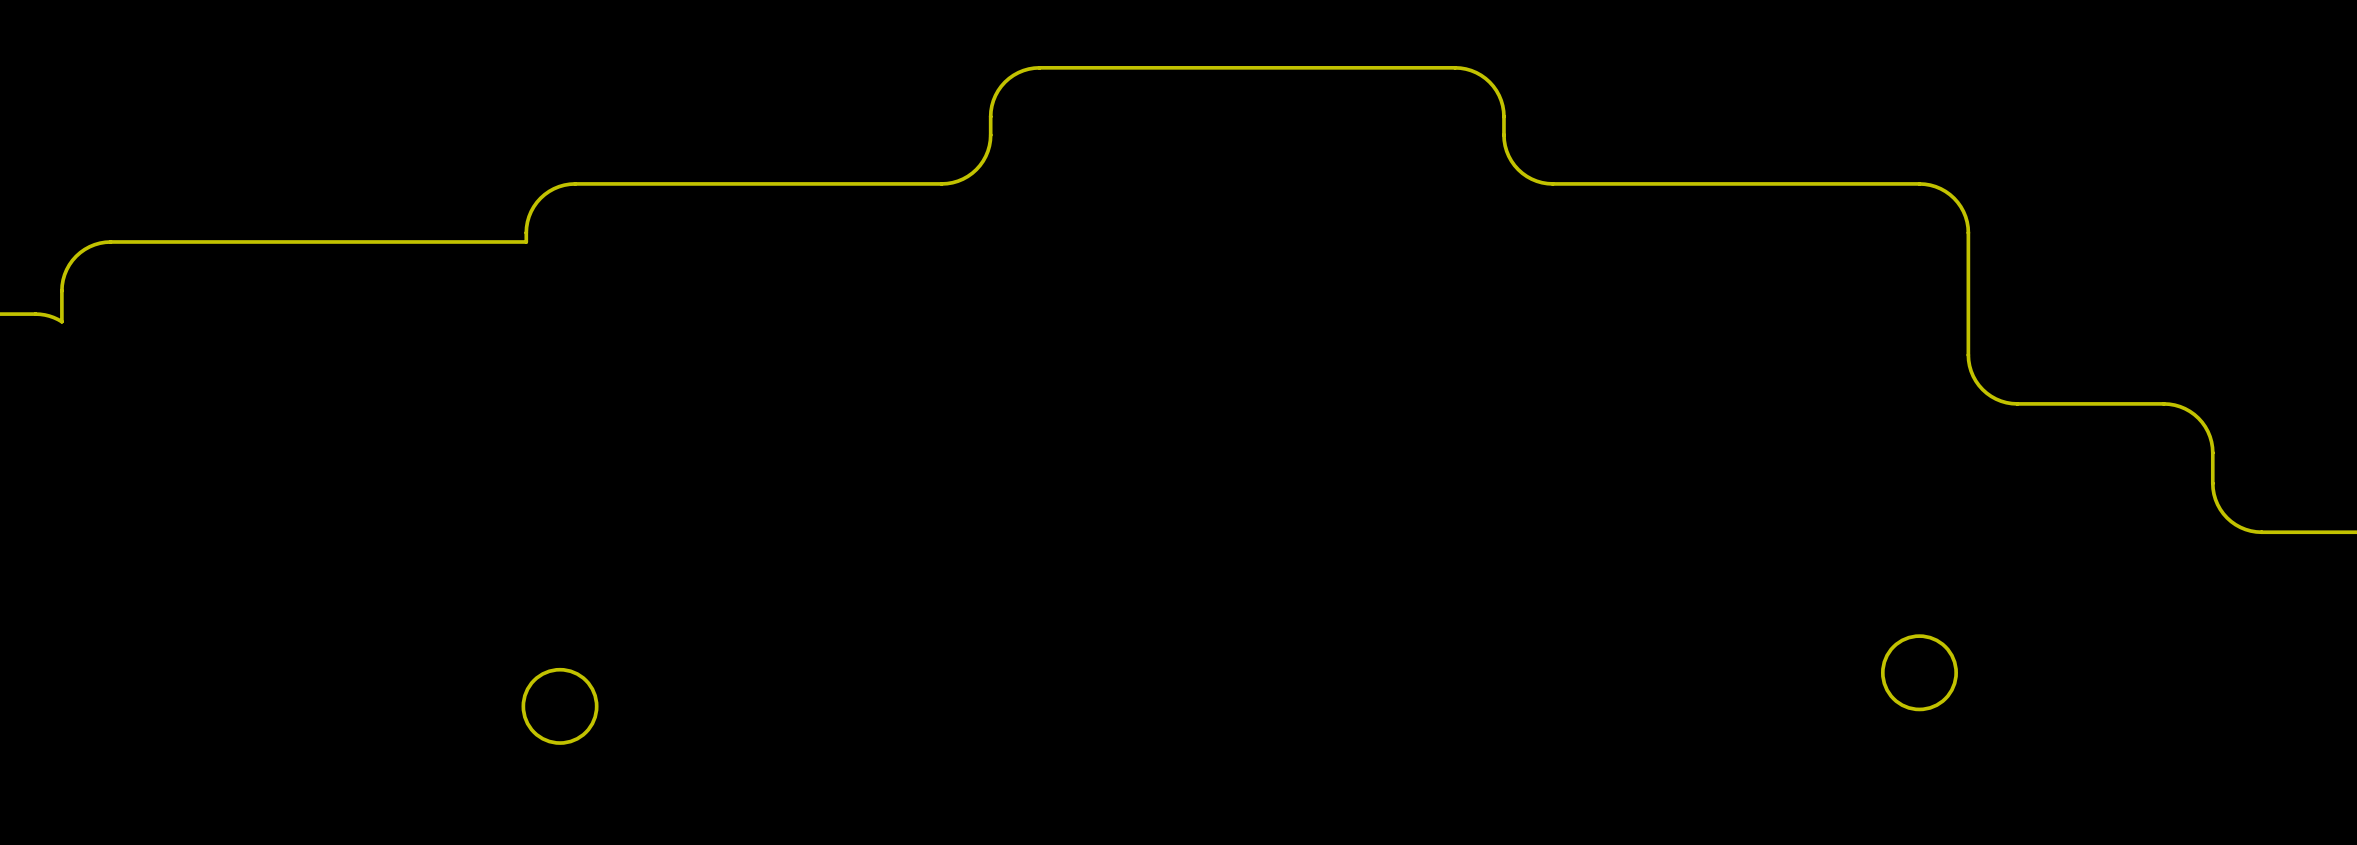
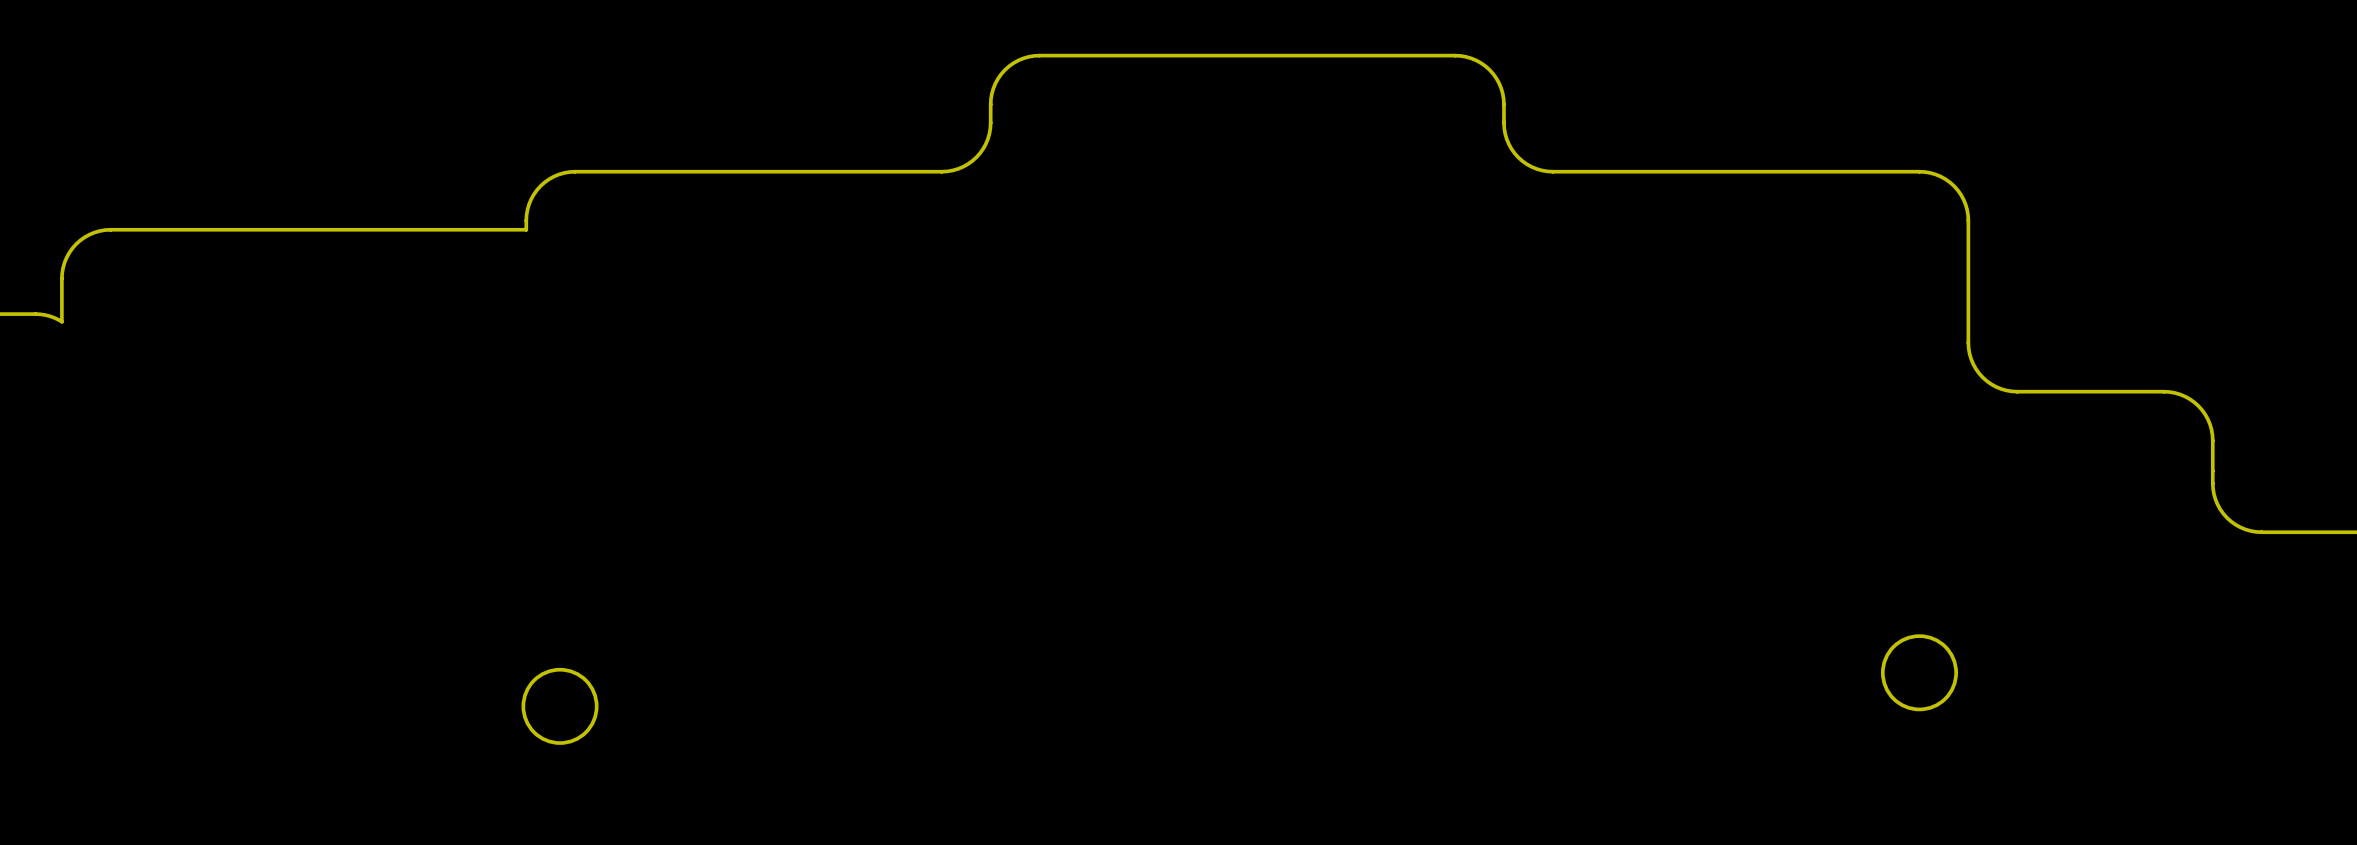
board edge: (1503, 116) (1501, 100) (1489, 82) (1471, 70) (1455, 67) (1034, 68) (1018, 72) (1005, 82) (995, 95) (990, 116) -> (1503, 116) (1502, 93) (1493, 74) (1476, 60) (1455, 55) (1034, 55) (1018, 60) (1001, 74) (991, 93) (990, 116)
board edge: (990, 122) (989, 145) (983, 161) (967, 176) (952, 182) (569, 184) (549, 191) (536, 202) (527, 221) (526, 241) (105, 242) (89, 246) (72, 260) (64, 274) (61, 290) -> (990, 122) (987, 138) (980, 153) (963, 166) (947, 171) (564, 172) (549, 179) (533, 194) (527, 209) (526, 229) (99, 230) (80, 240) (69, 252) (63, 267) (61, 290)
board edge: (1503, 122) (1505, 145) (1511, 161) (1526, 176) (1541, 182) (1924, 184) (1945, 191) (1957, 202) (1965, 216) (1968, 232) -> (1503, 122) (1506, 138) (1514, 153) (1526, 164) (1547, 171) (1930, 172) (1945, 179) (1960, 194) (1967, 209) (1968, 232)
board edge: (1968, 342) (1968, 360) (1973, 376) (1982, 389) (1996, 399) (2017, 403) (2174, 405) (2189, 411) (2202, 422) (2210, 436) (2212, 452) -> (1968, 342) (1971, 358) (1979, 373) (1991, 384) (2006, 390) (2163, 391) (2185, 396) (2198, 406) (2207, 419) (2212, 435) (2212, 452)

